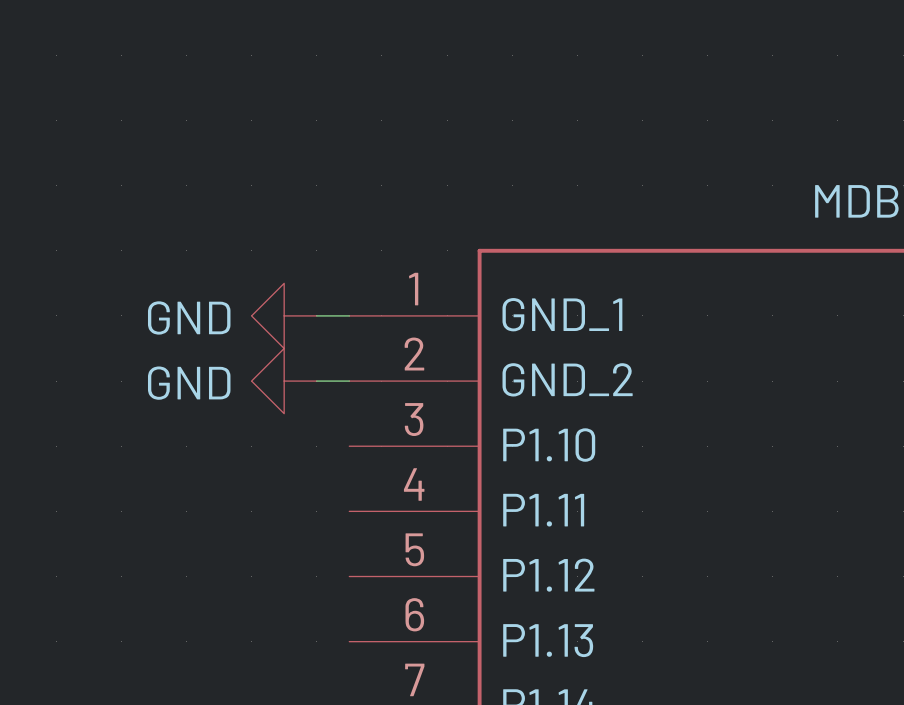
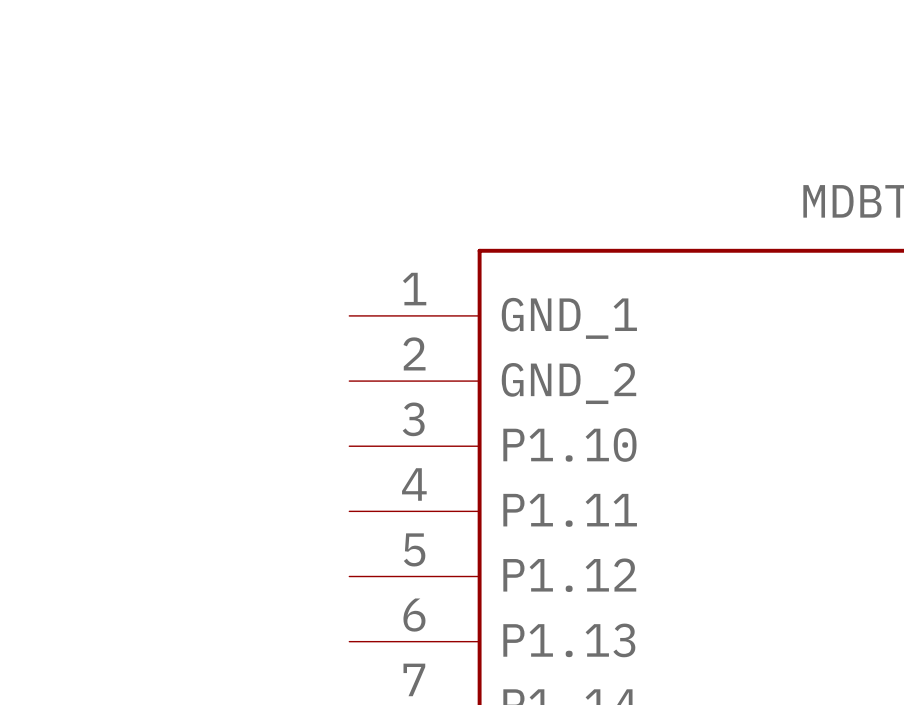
power symbol: GND (284, 315) -> none
wire: (316, 315) (349, 315) -> none
power symbol: GND (284, 381) -> none
wire: (316, 381) (349, 381) -> none

